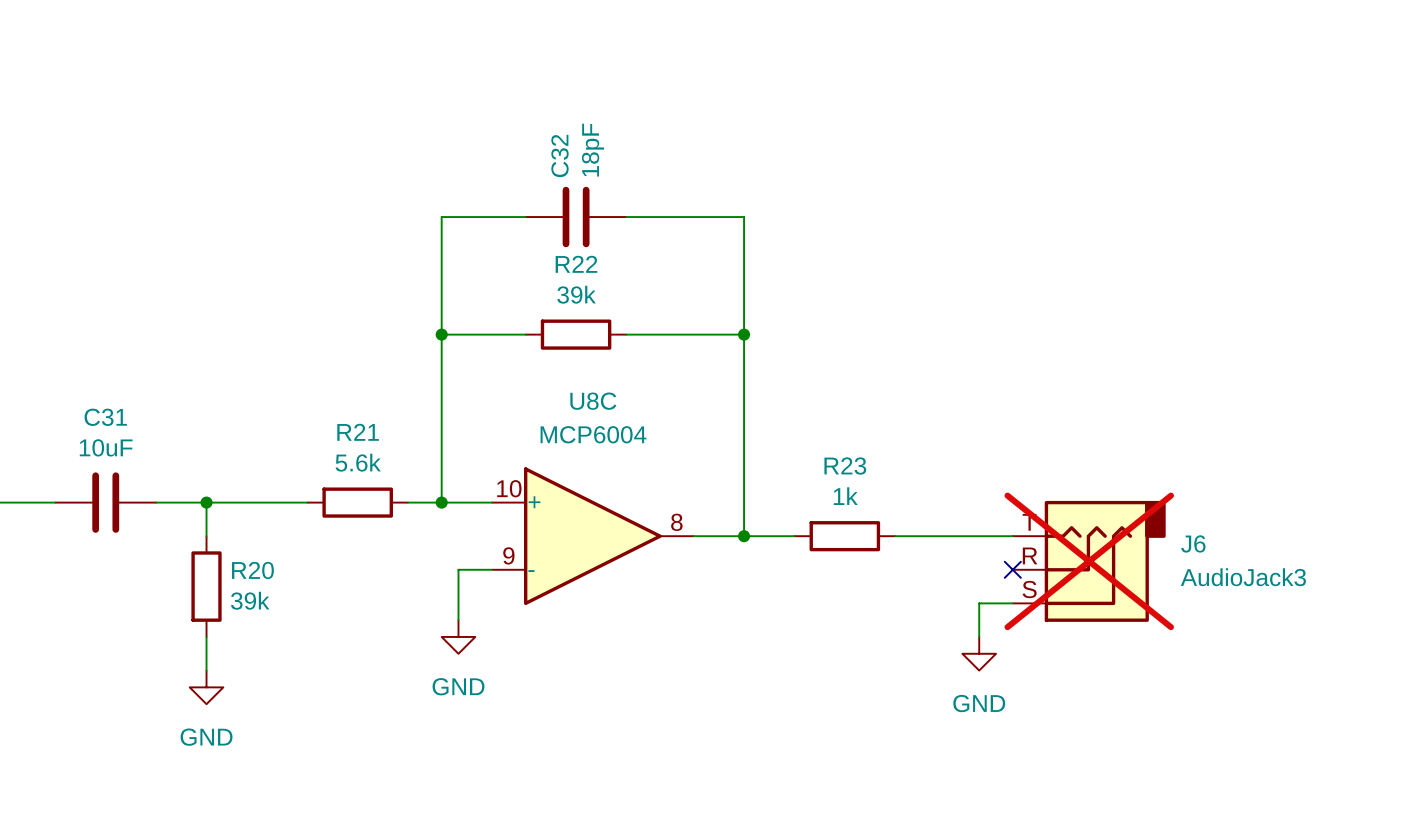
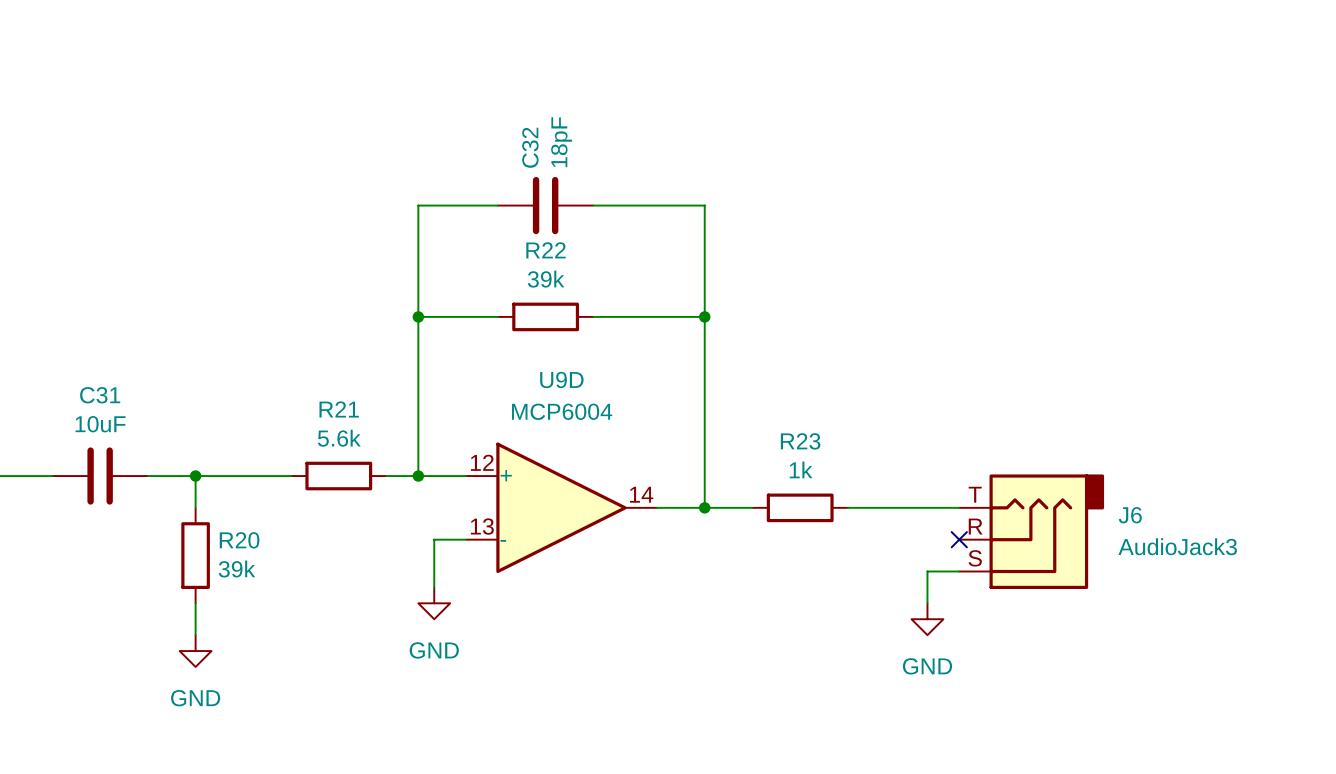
U8C name: U8C (593, 401) -> U9D (561, 379)
U8C pin number: 10 (509, 488) -> 12 (482, 462)
U8C pin number: 8 (676, 522) -> 14 (641, 494)
U8C pin number: 9 (508, 555) -> 13 (482, 526)
J6 do-not-place cross: (1089, 561) -> none

